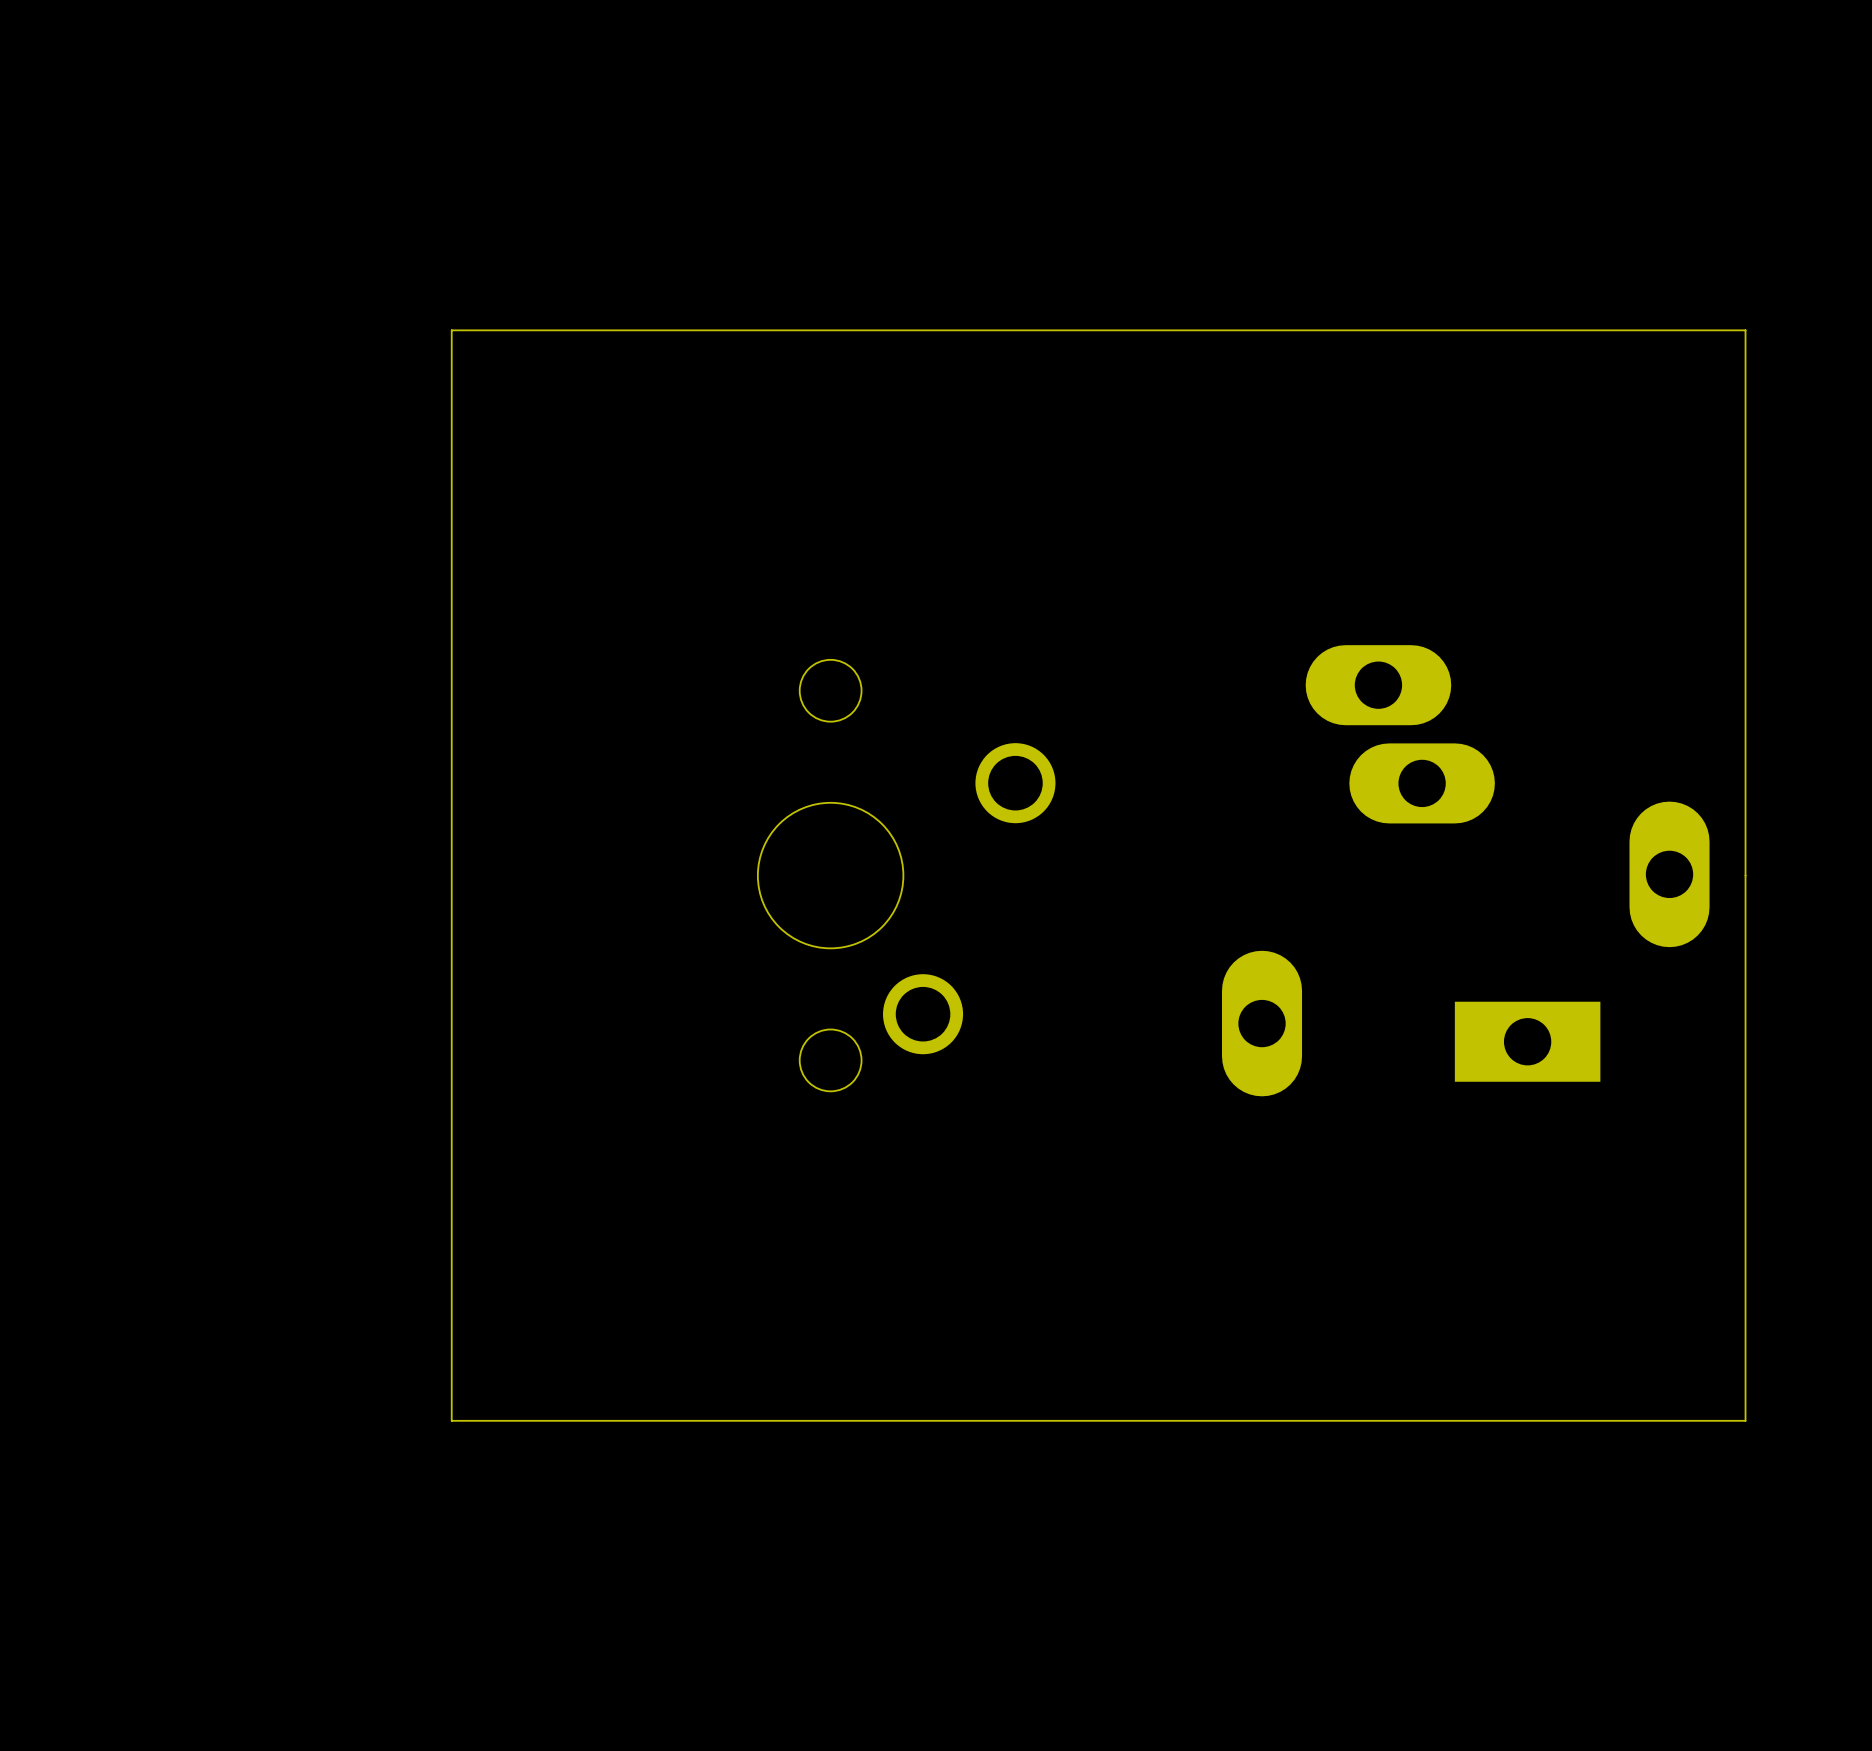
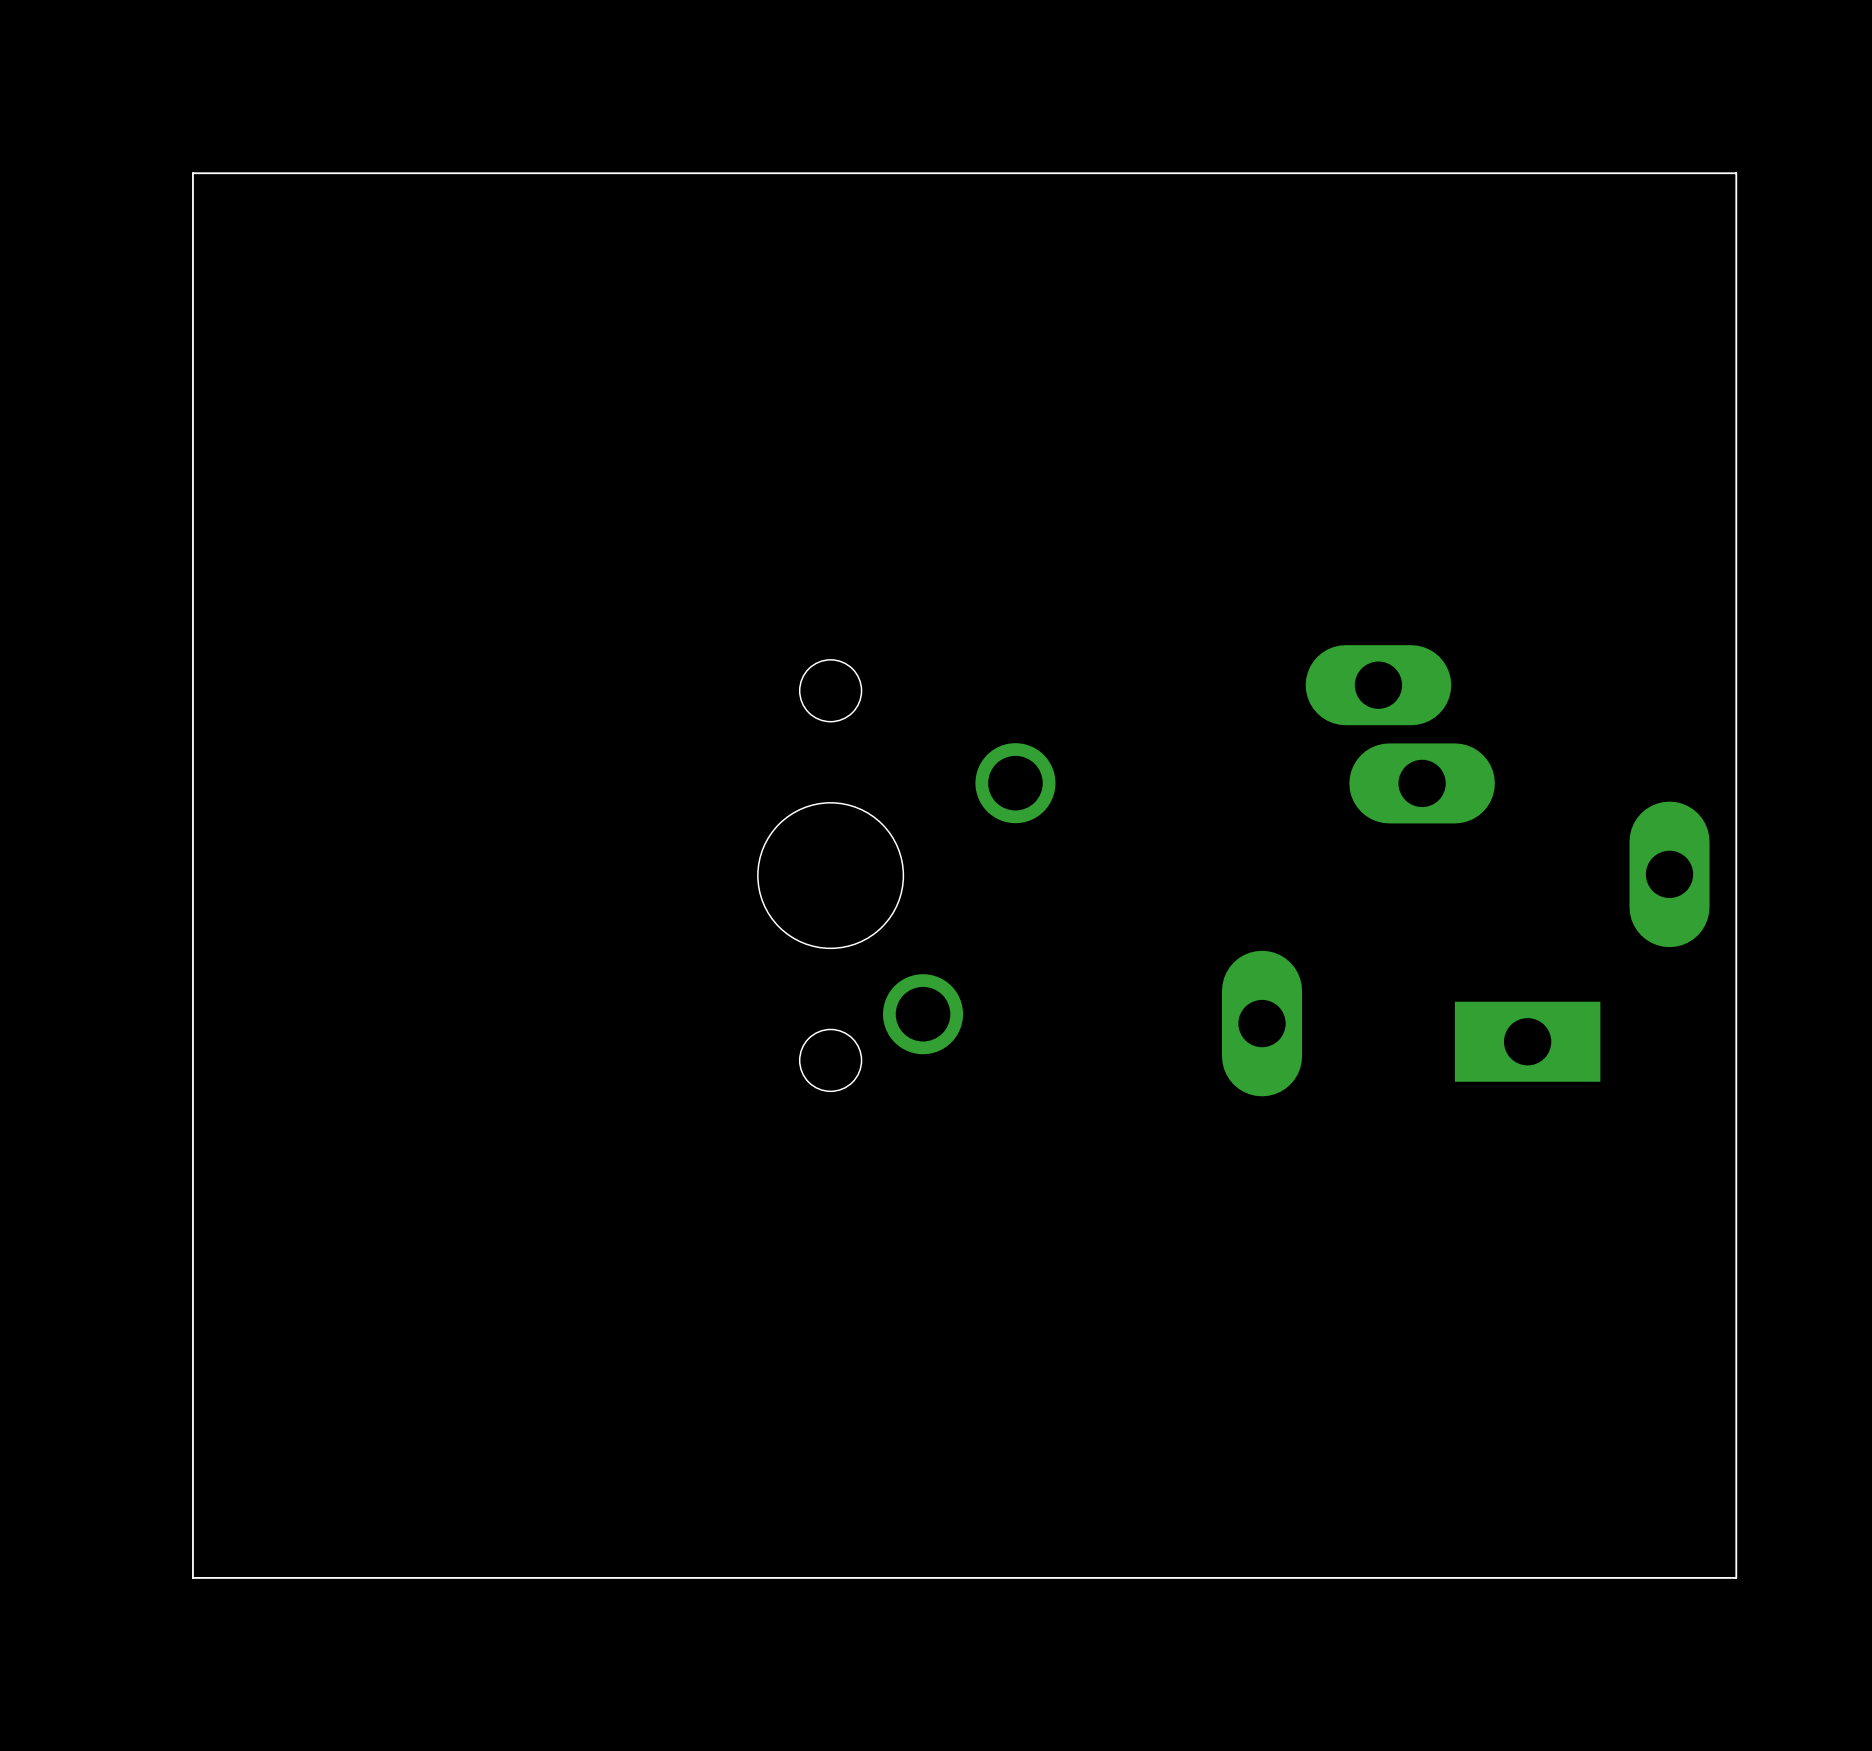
board edge: (1745, 330) (451, 330) (451, 1420) (1745, 1420) (1745, 330) -> (1736, 173) (1736, 1577) (192, 1577) (192, 173) (1736, 173)

